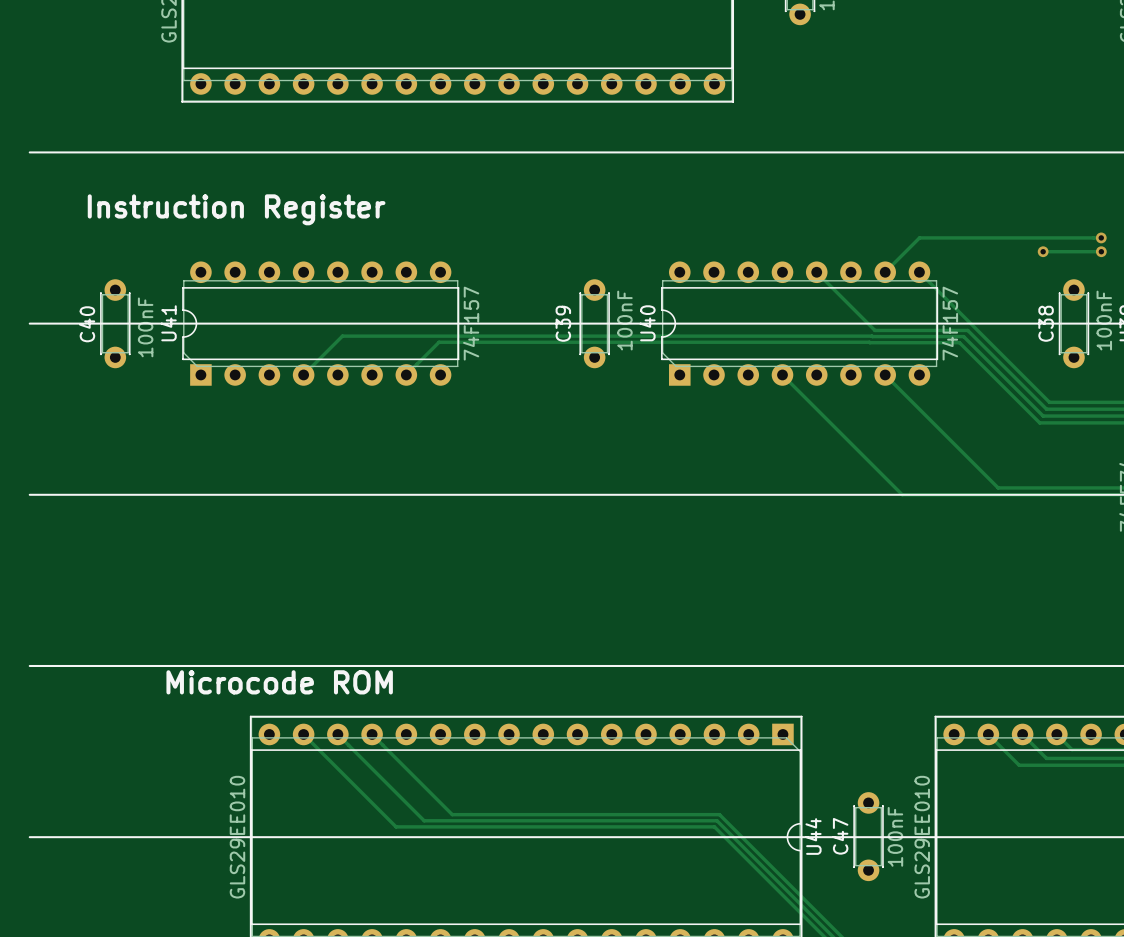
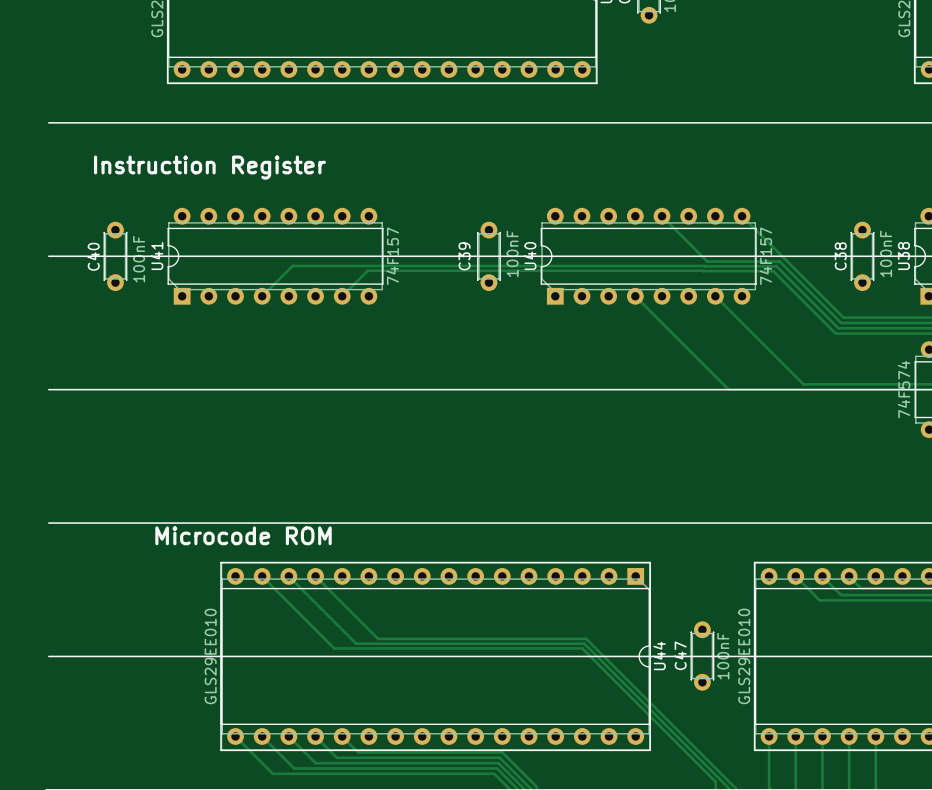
track: (1101, 237) (919, 237) (885, 272) -> none
via: (1101, 237) -> none
track: (1043, 251) (1101, 251) -> none
via: (1043, 251) -> none
via: (1101, 251) -> none

